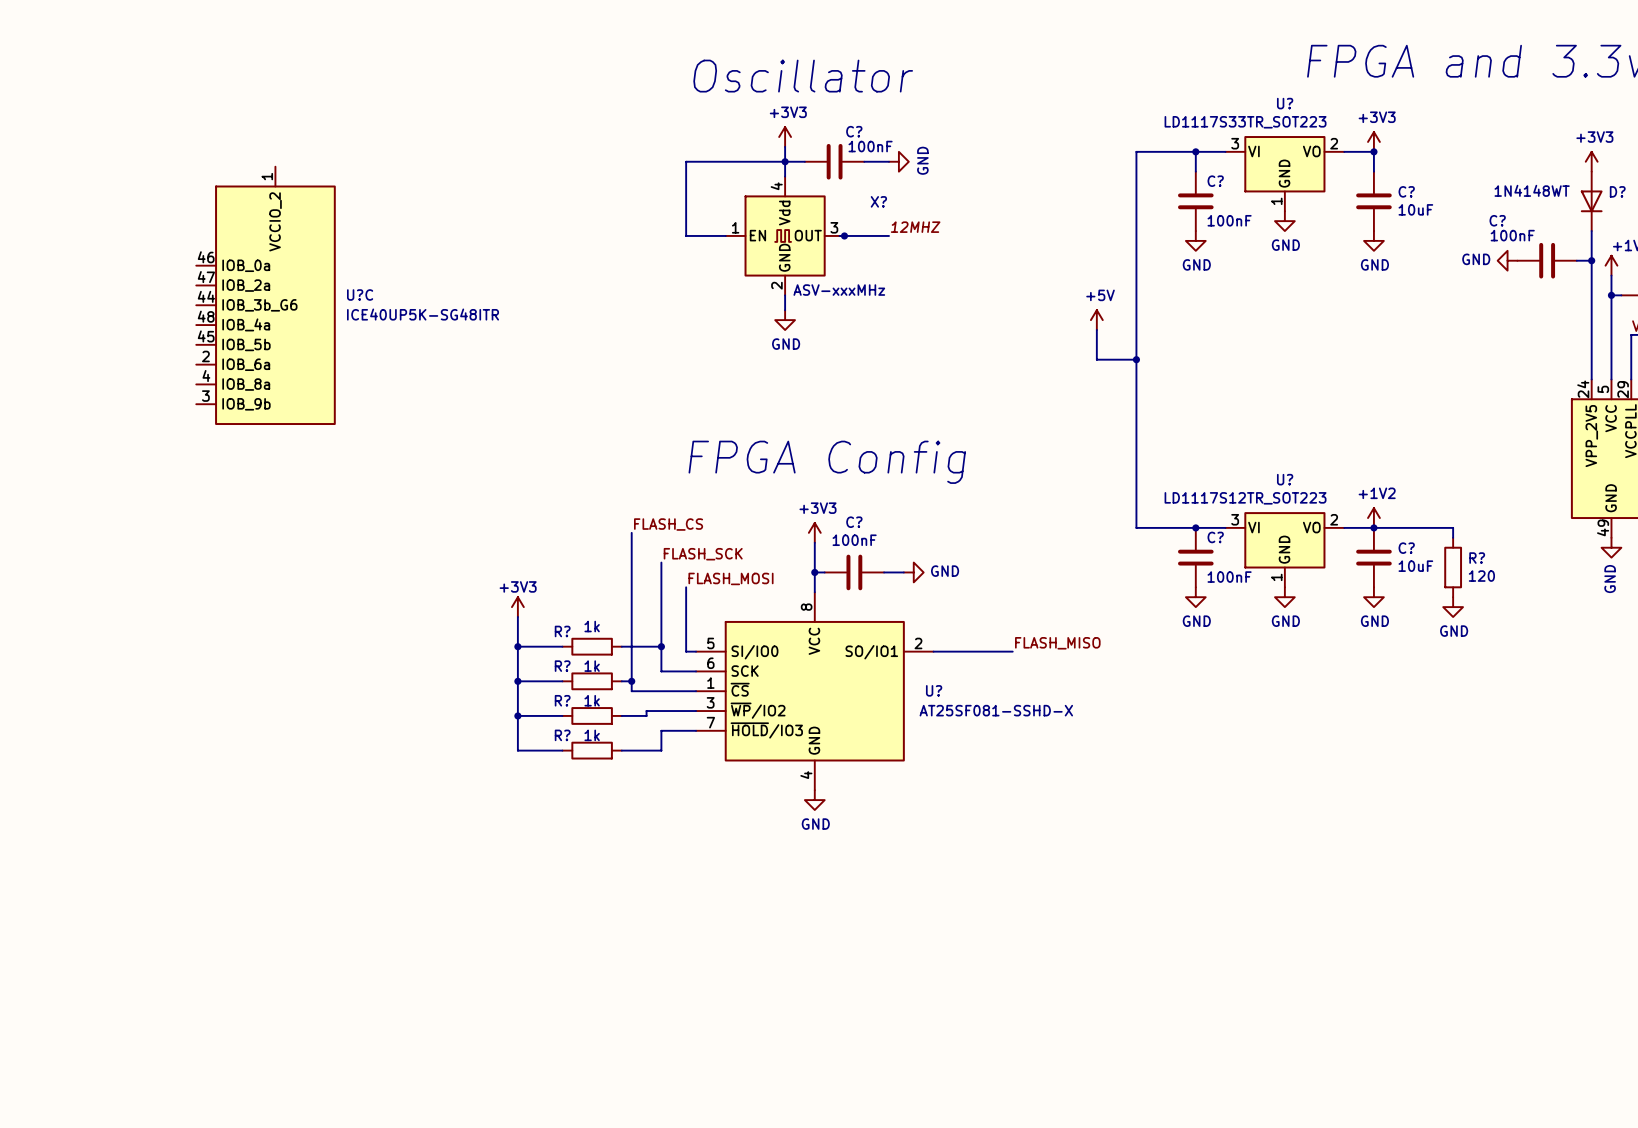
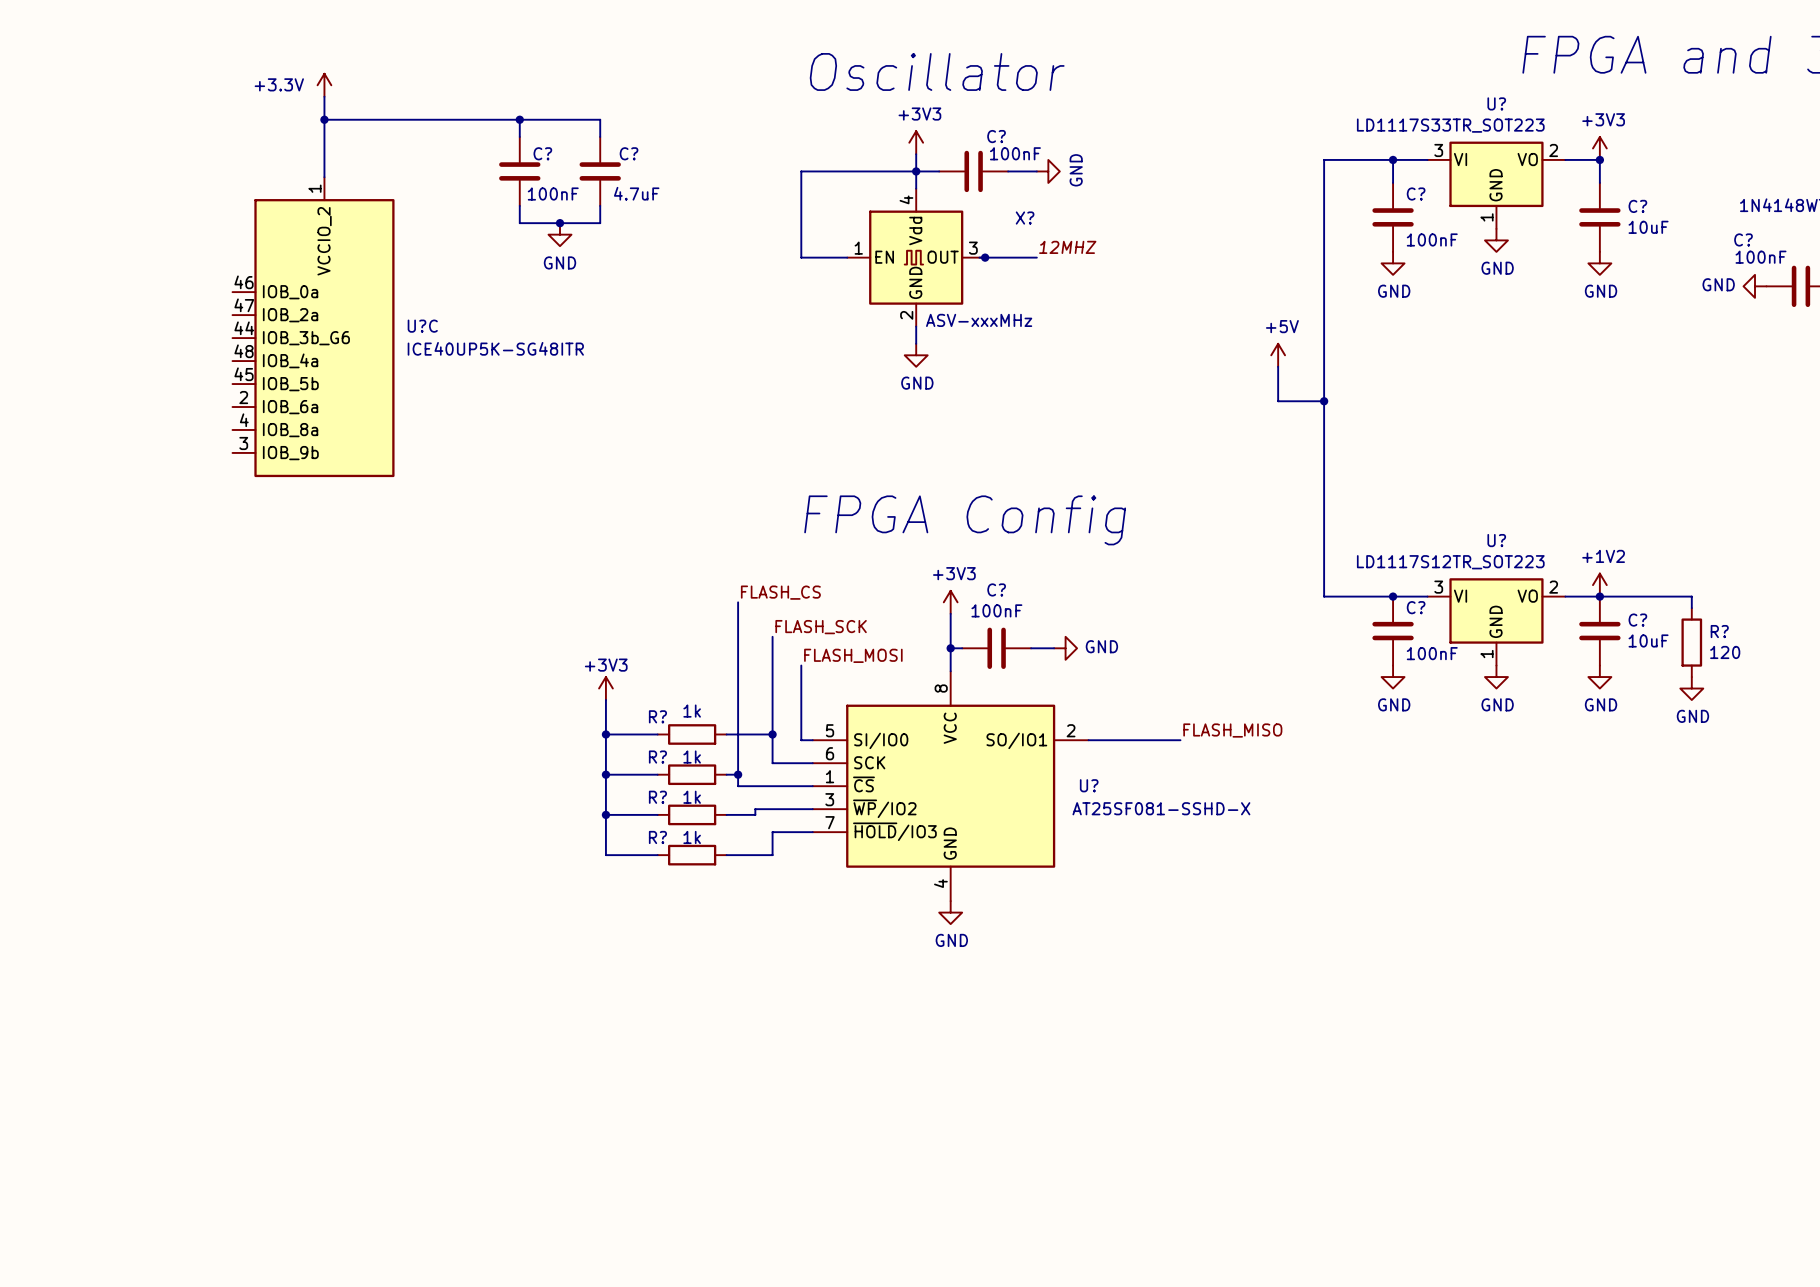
power symbol: none -> +3.3V (324, 85)
wire: none -> (324, 96) (324, 177)
wire: none -> (324, 119) (600, 119) (600, 136)
junction: none -> (324, 119)
wire: none -> (519, 119) (519, 136)
junction: none -> (519, 119)
C?: none -> 100nF (519, 171)
C?: none -> 4.7uF (600, 171)
wire: none -> (519, 205) (519, 223) (600, 223) (600, 205)
junction: none -> (560, 223)
power symbol: none -> GND (560, 234)

